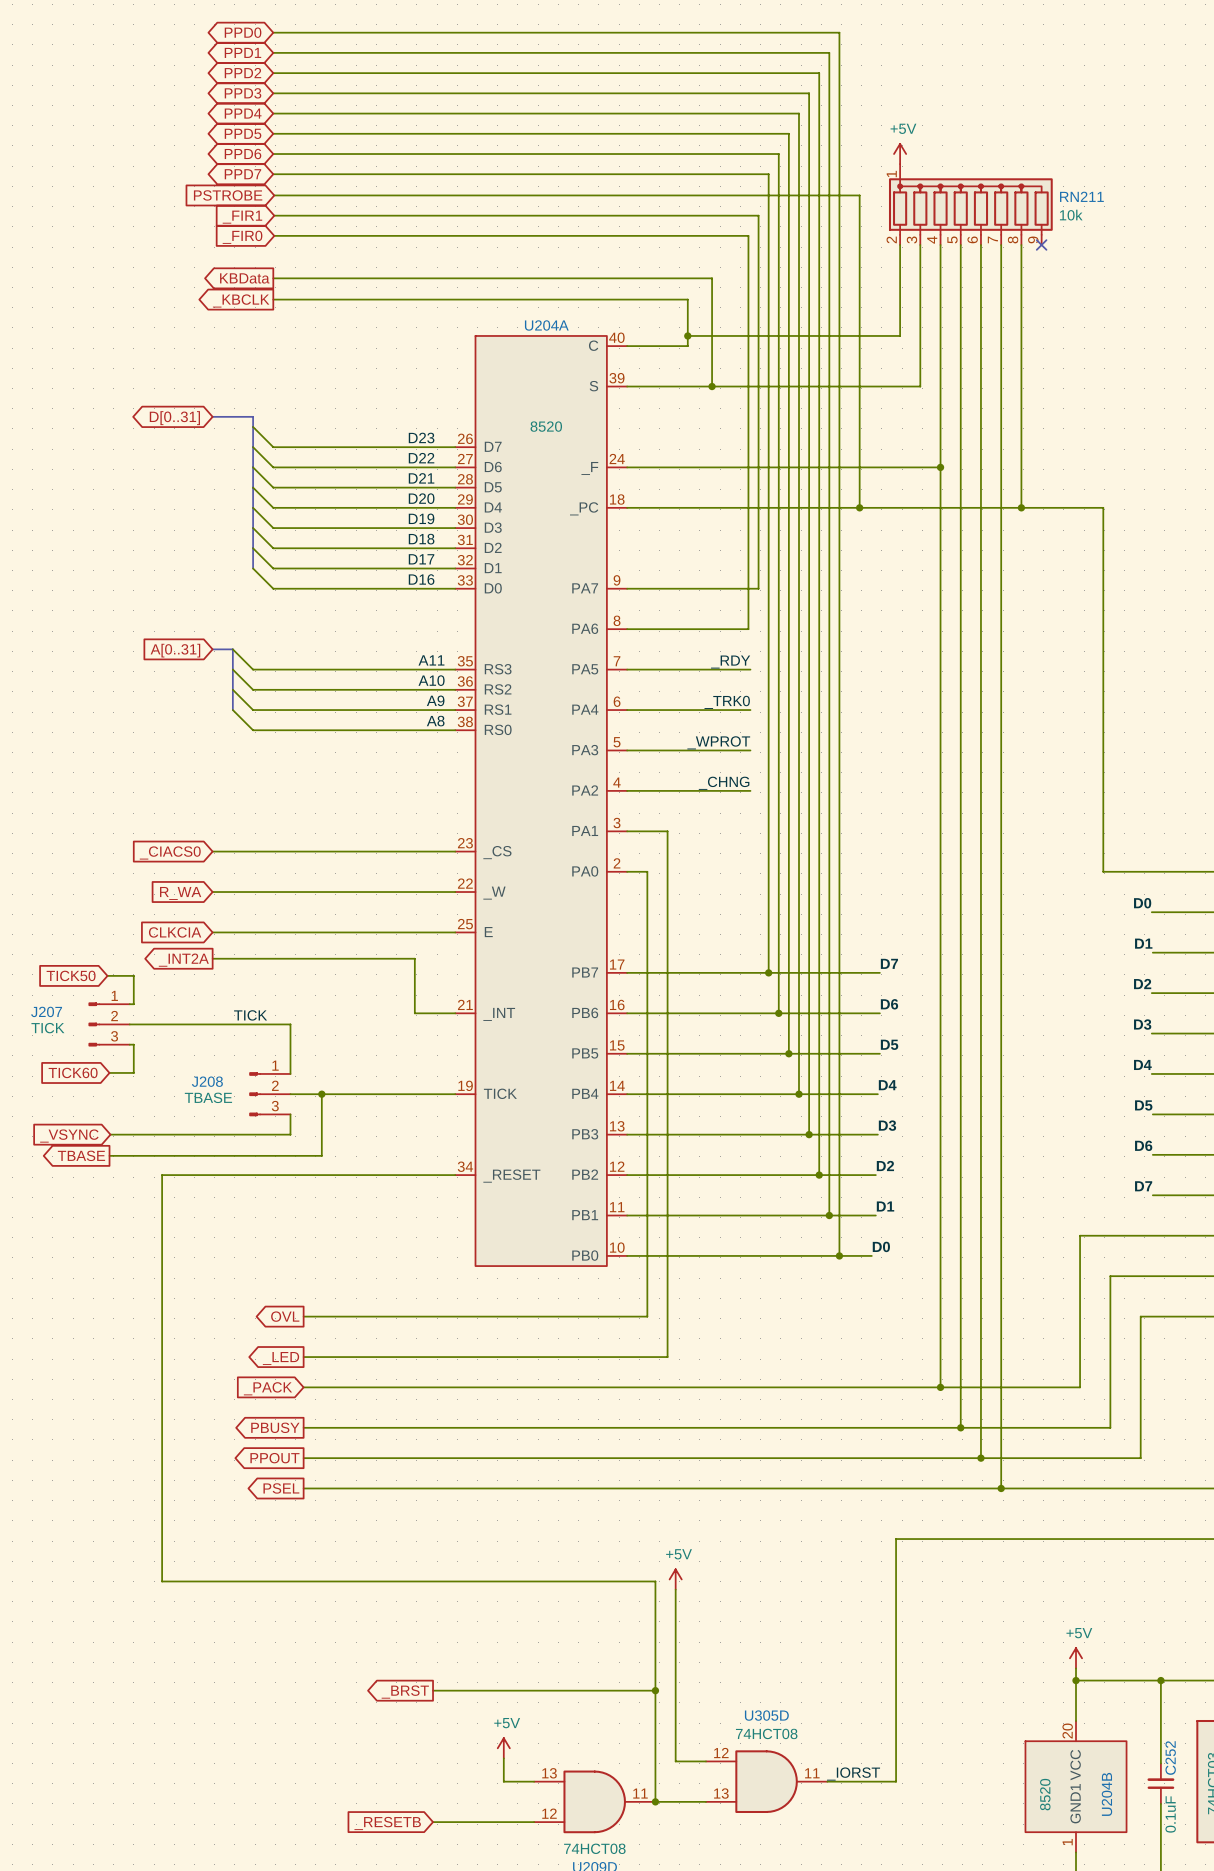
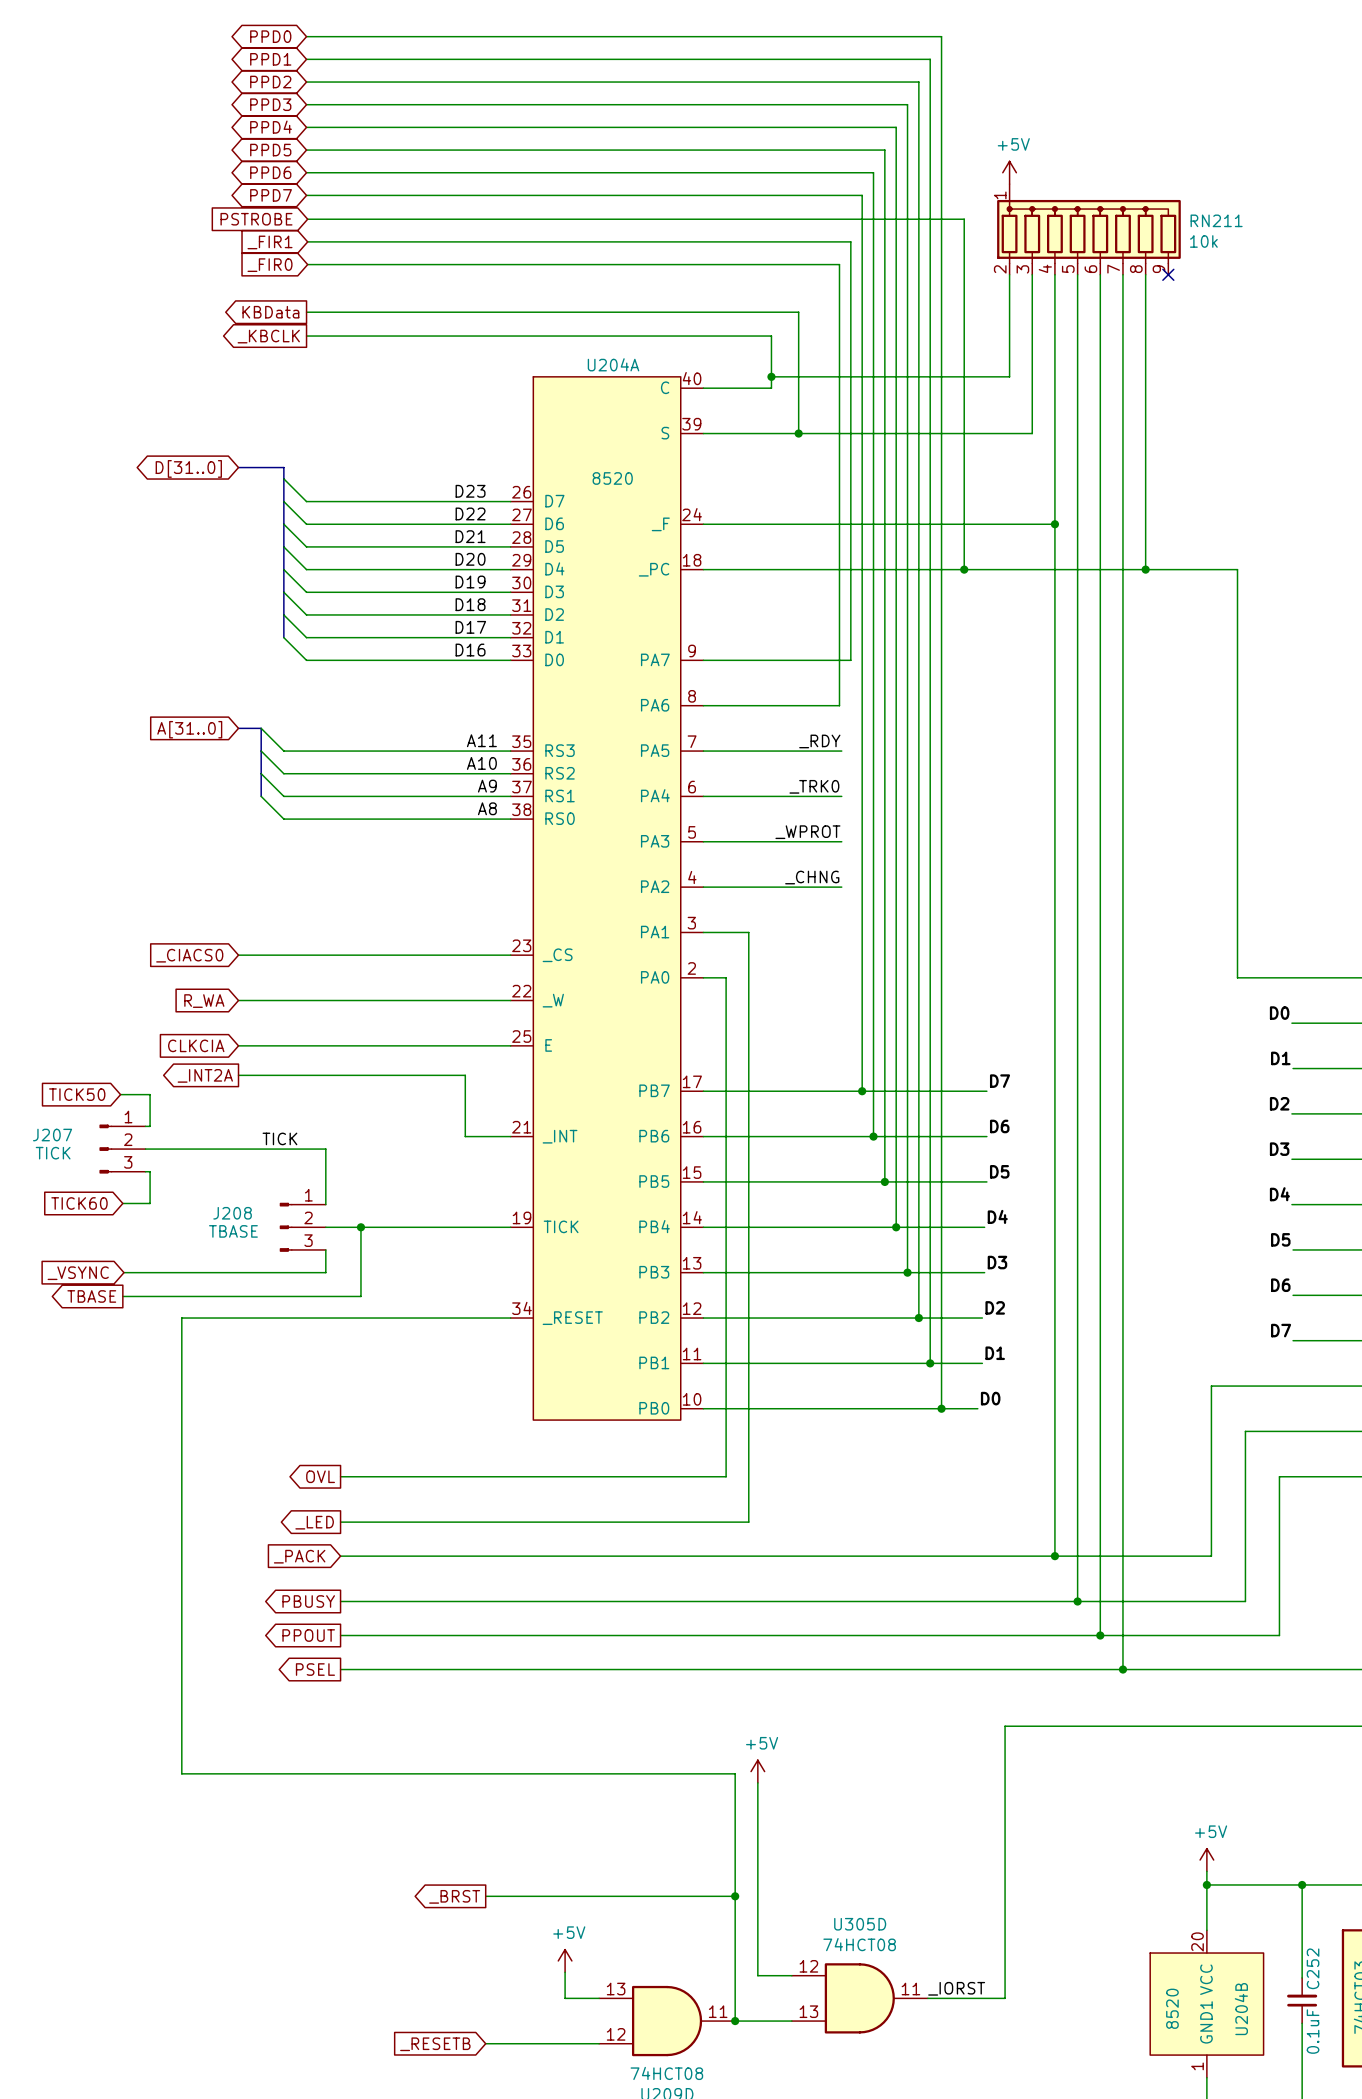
global label: D[0..31] (174, 418) -> D[31..0] (188, 468)
global label: A[0..31] (175, 650) -> A[31..0] (189, 729)

